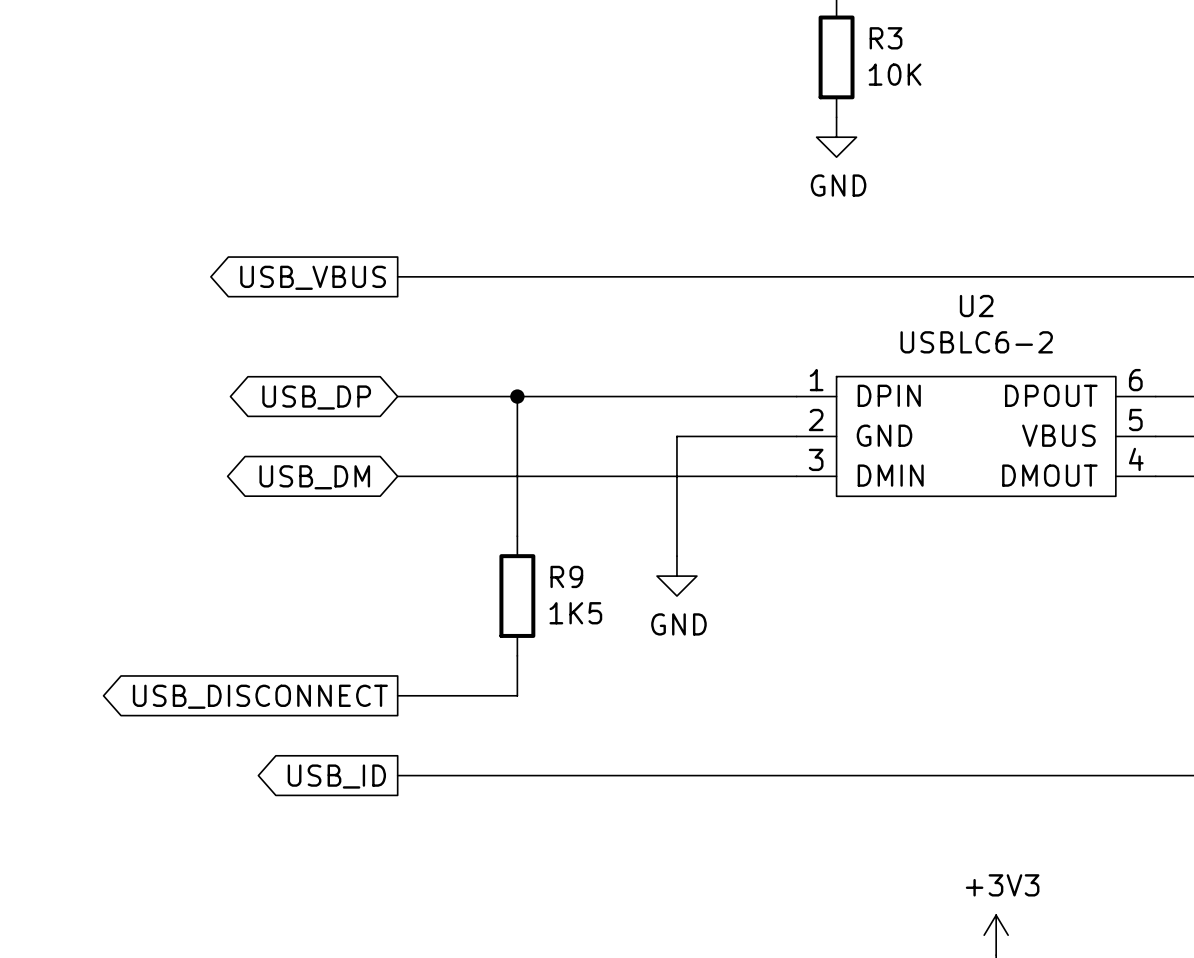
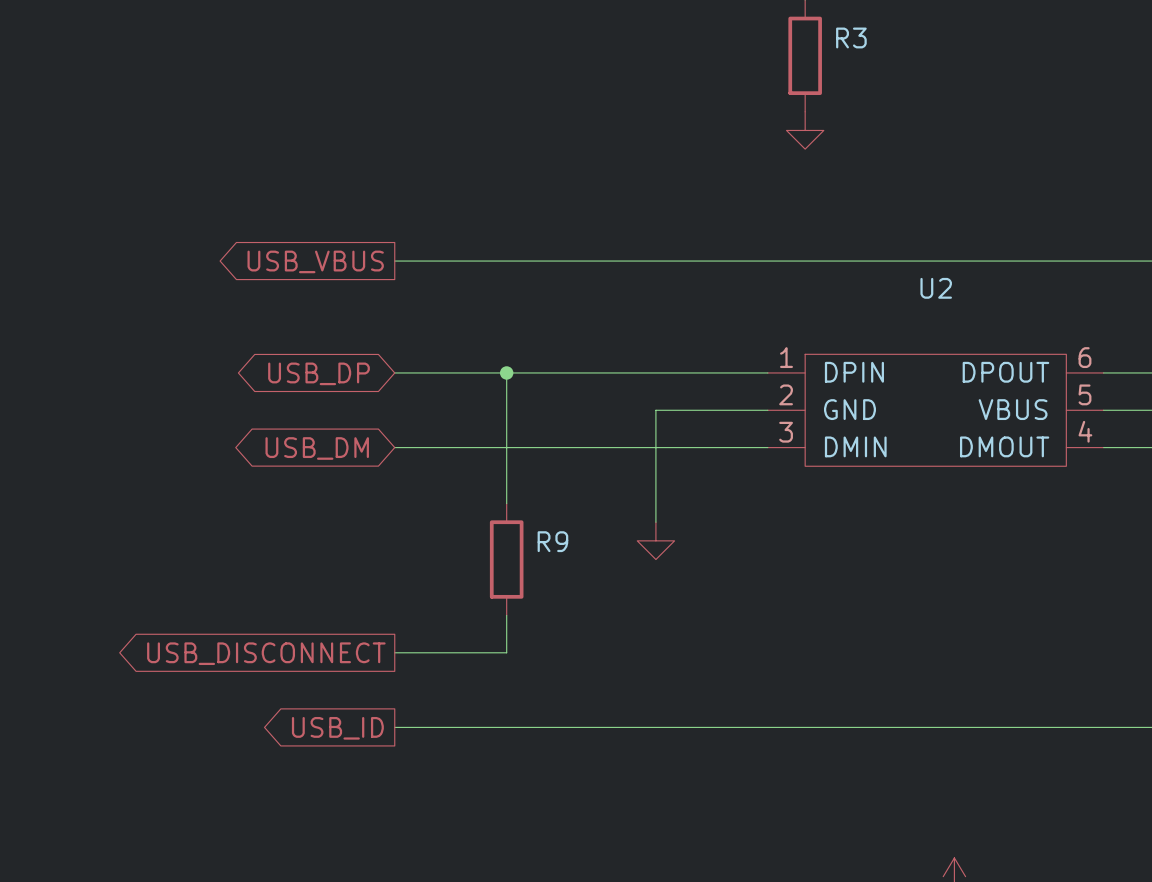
R3 value: 10K (895, 74) -> none
power symbol text: GND (838, 185) -> none
U2 value: USBLC6-2 (976, 342) -> none
R9 value: 1K5 (575, 613) -> none
power symbol text: GND (678, 624) -> none
power symbol text: +3V3 (1002, 885) -> none

